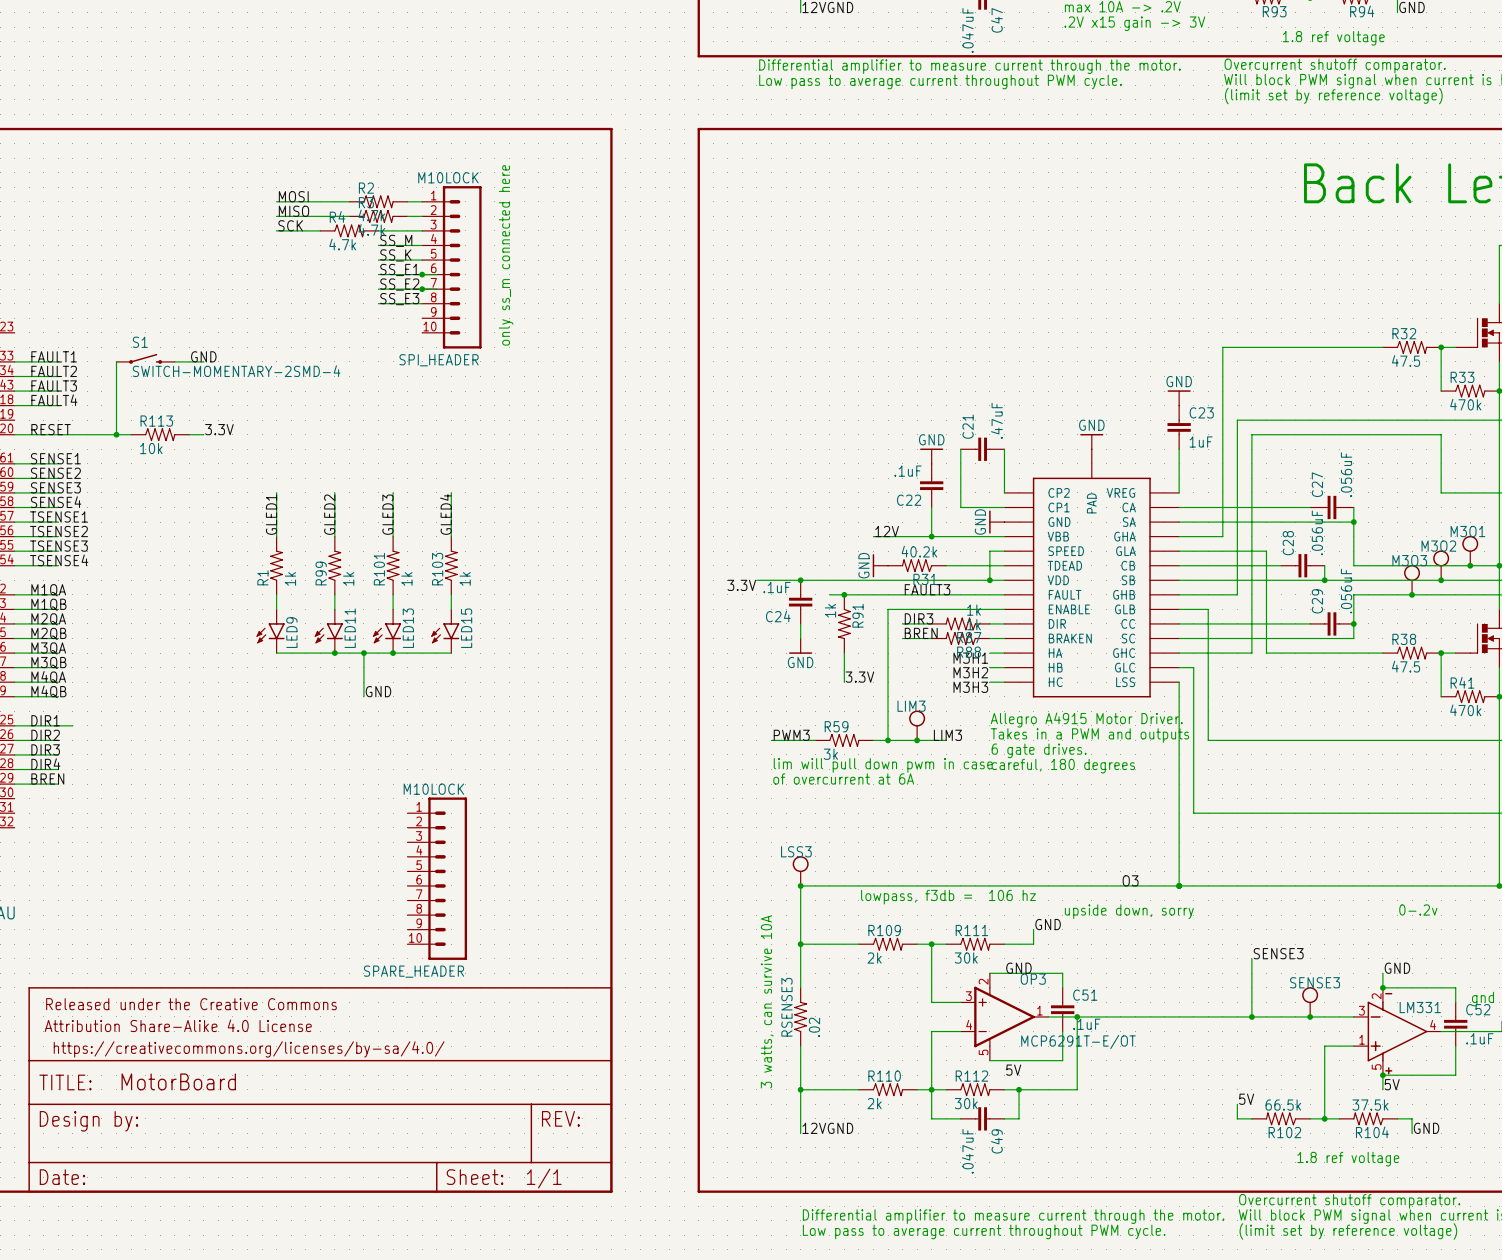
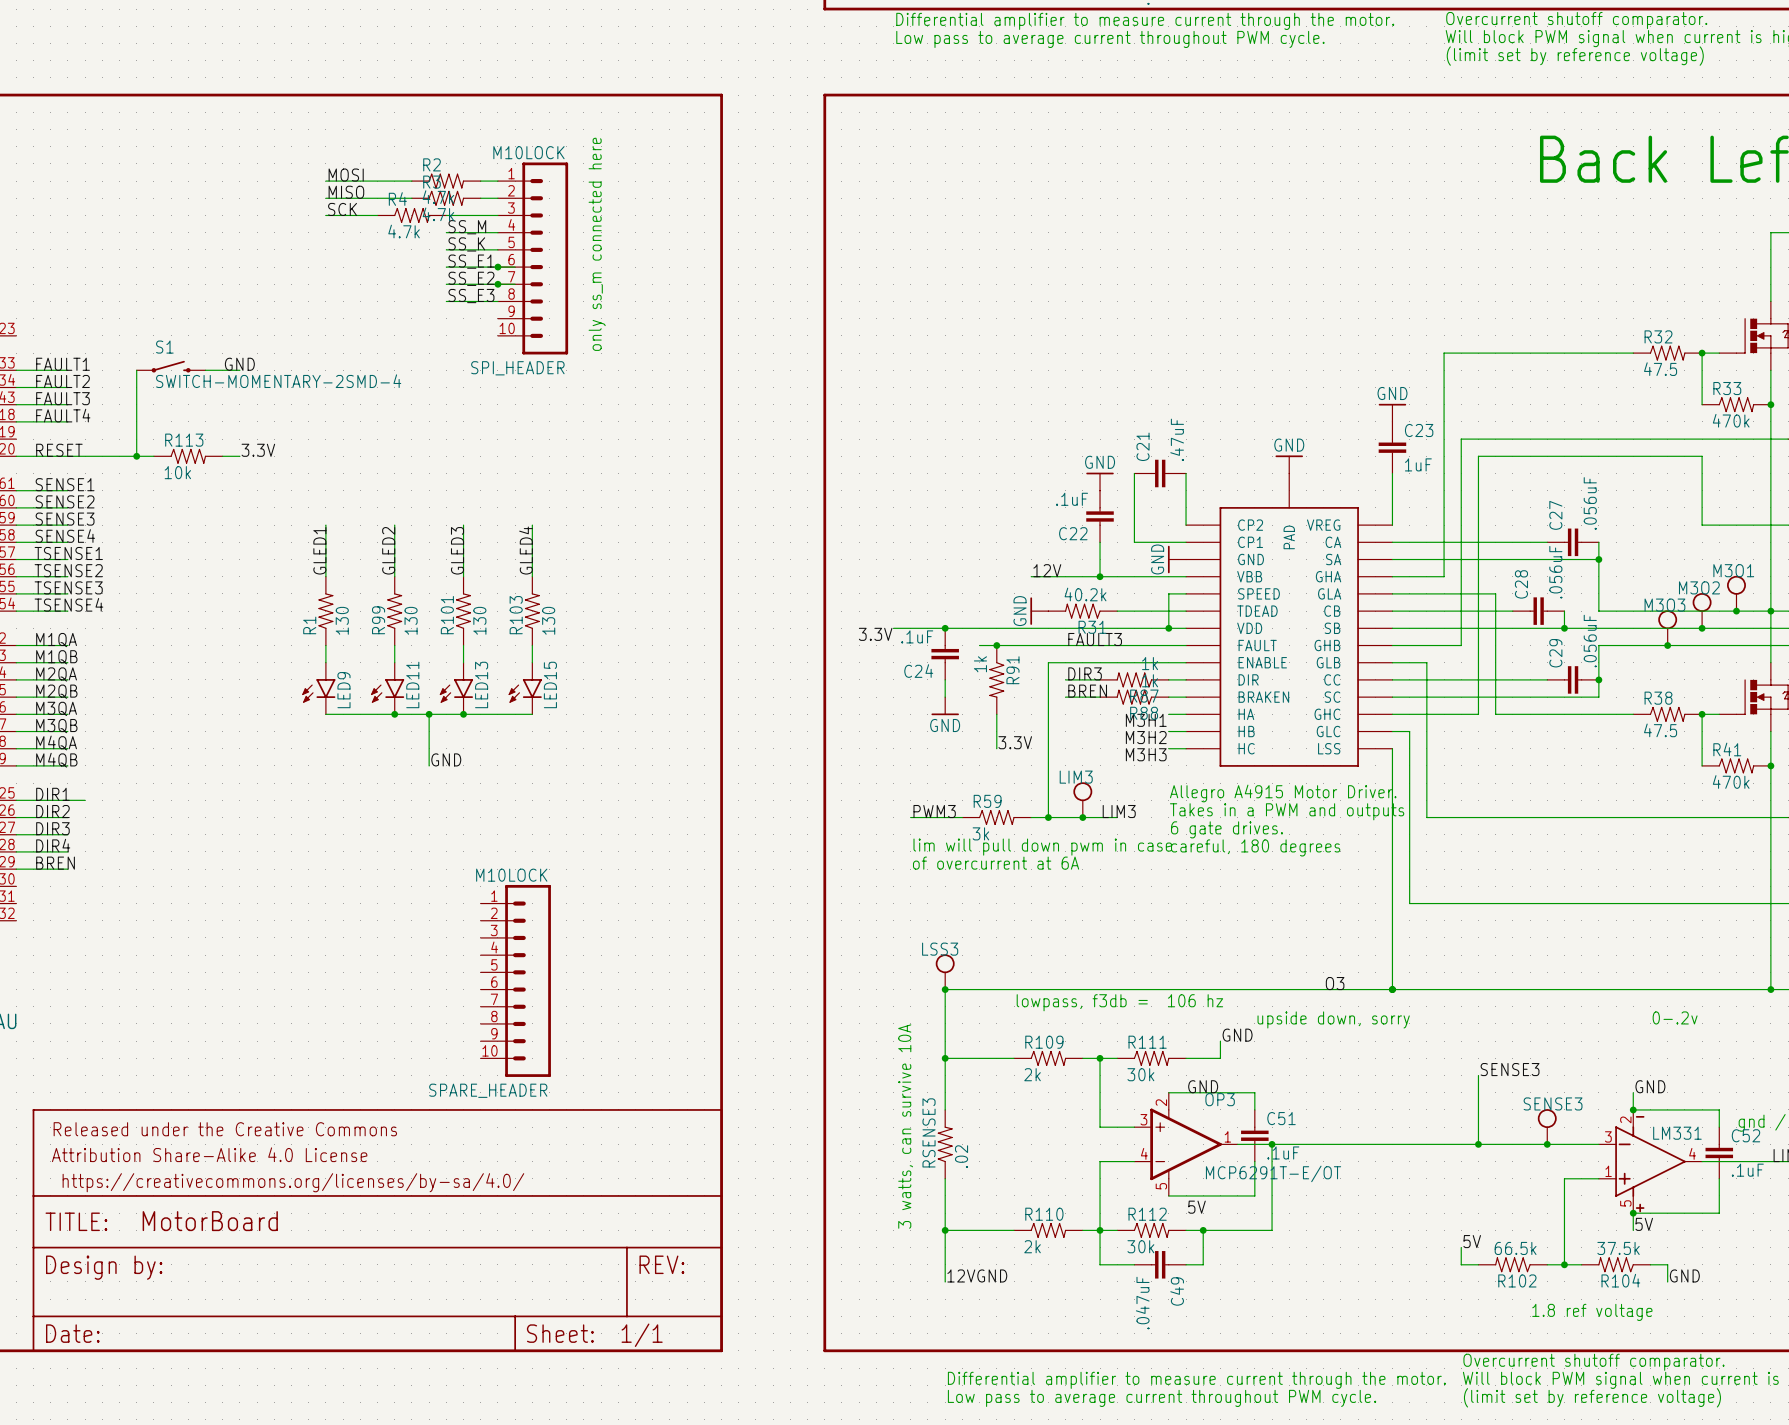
R1 value: 1k (290, 578) -> 130 (342, 620)
R99 value: 1k (348, 578) -> 130 (411, 620)
R101 value: 1k (406, 578) -> 130 (479, 620)
R103 value: 1k (465, 578) -> 130 (548, 620)

